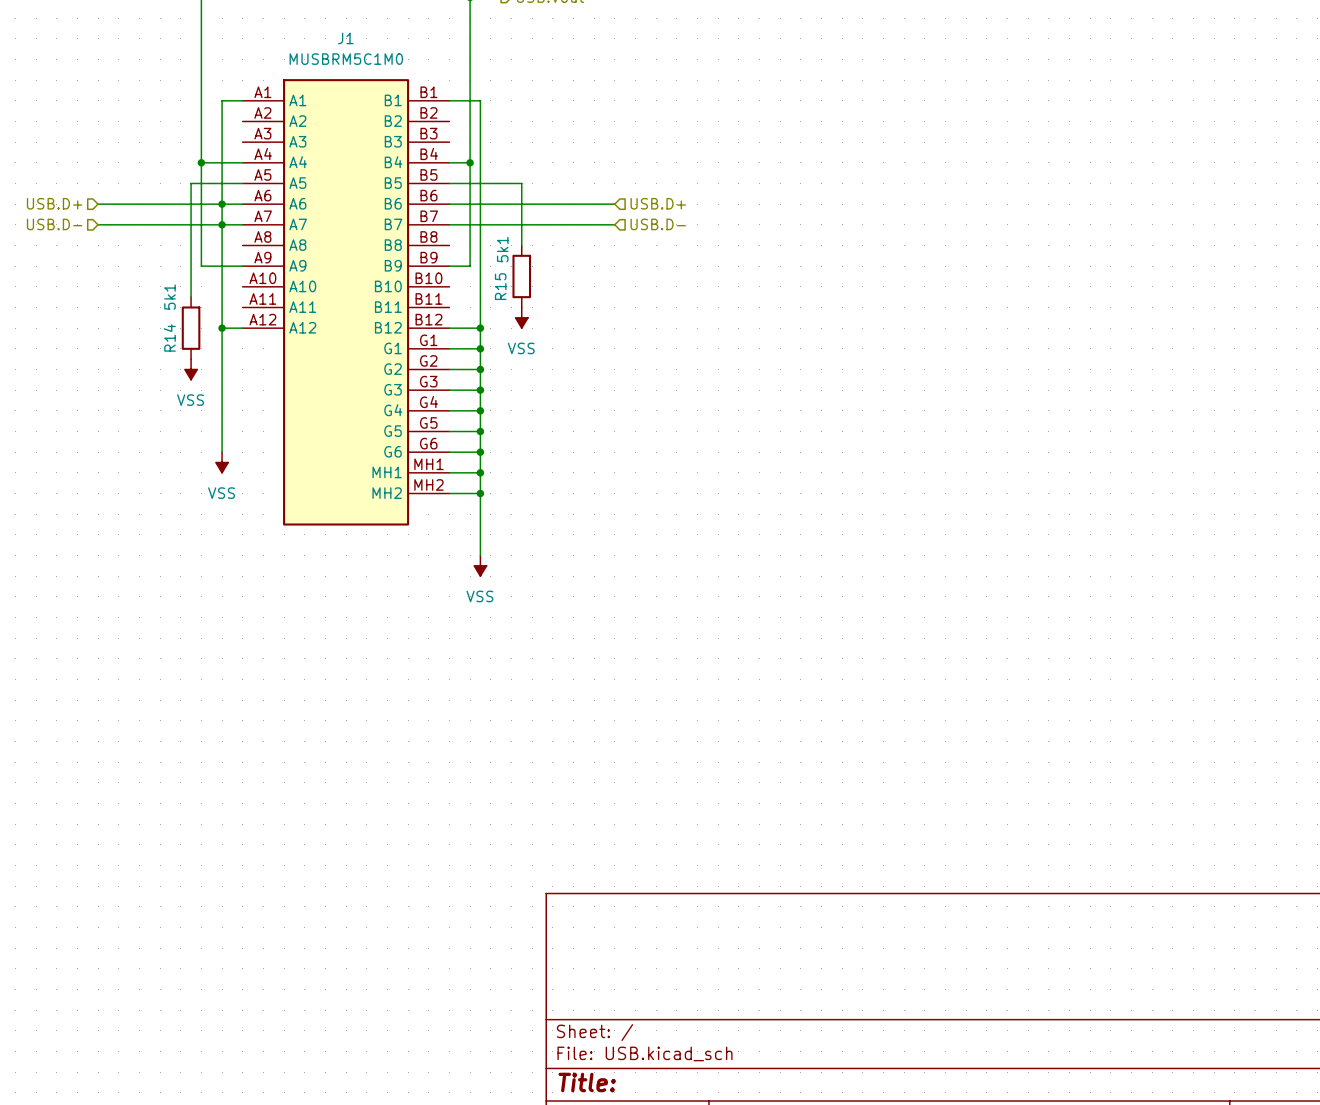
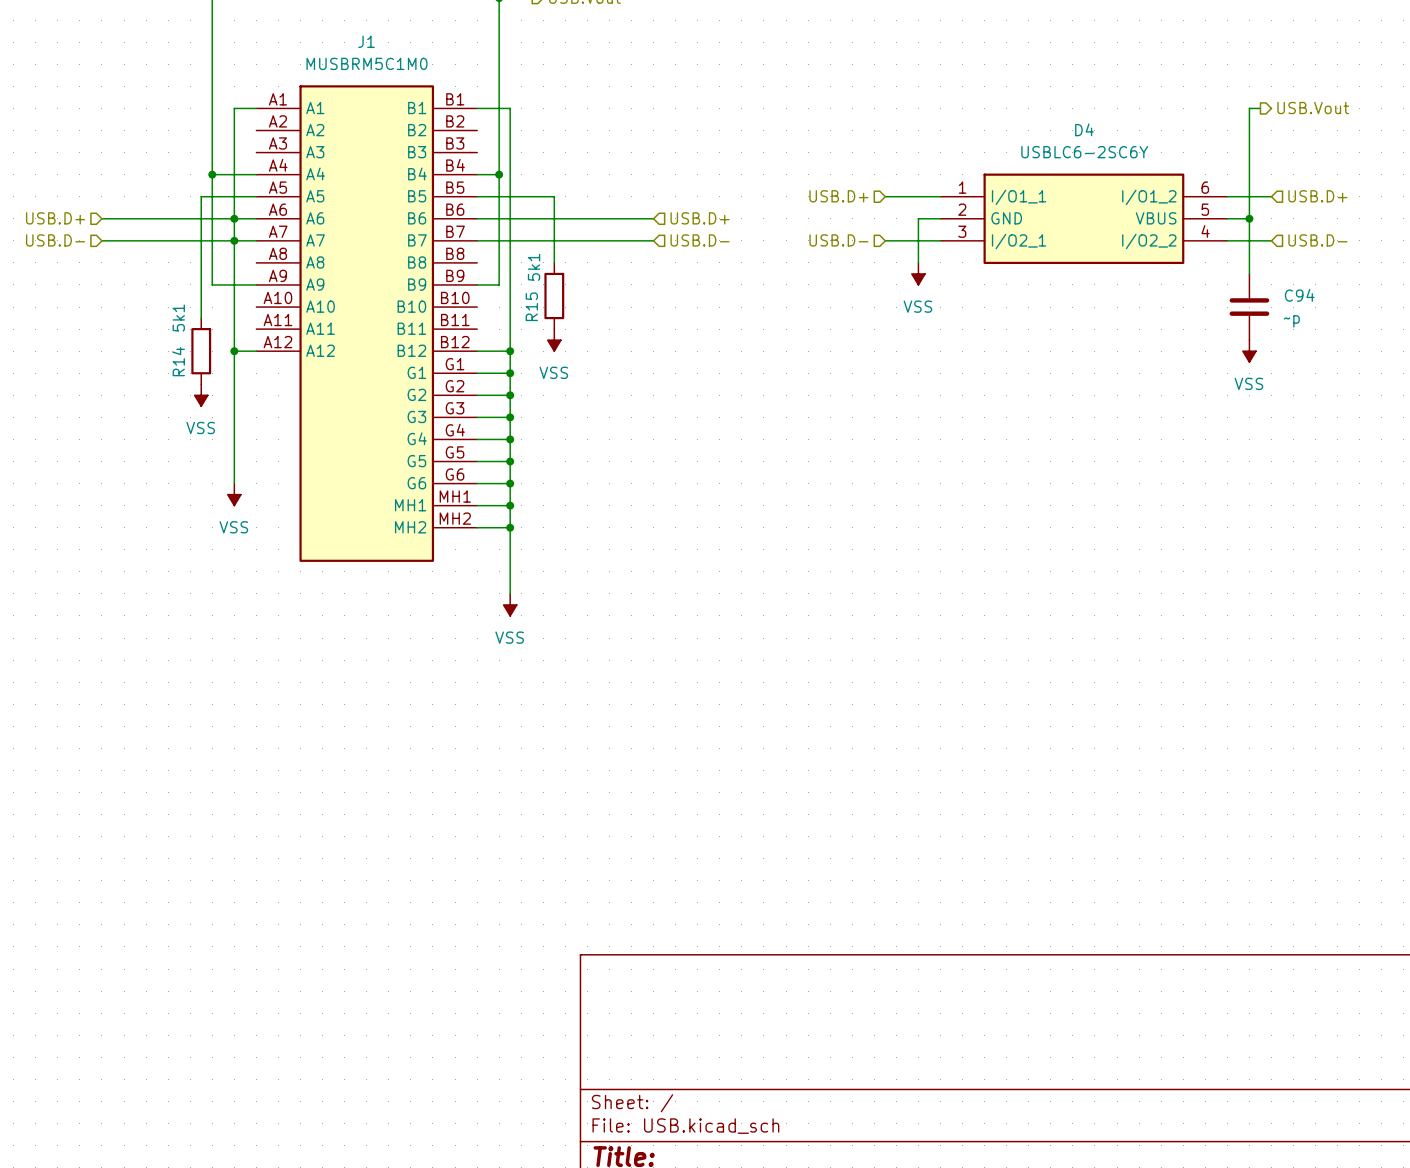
wire: none -> (1260, 108) (1249, 108) (1249, 273)
hierarchical label: none -> USB.Vout (1313, 108)
hierarchical label: none -> USB.D+ (838, 196)
wire: none -> (885, 196) (940, 196)
wire: none -> (1227, 196) (1271, 196)
hierarchical label: none -> USB.D+ (1317, 196)
wire: none -> (940, 218) (918, 218) (918, 262)
D4: none -> USBLC6-2SC6Y (1083, 218)
wire: none -> (1227, 218) (1249, 218)
junction: none -> (1249, 218)
hierarchical label: none -> USB.D- (838, 240)
wire: none -> (885, 240) (940, 240)
wire: none -> (1227, 240) (1271, 240)
hierarchical label: none -> USB.D- (1317, 240)
power symbol: none -> VSS (918, 273)
C94: none -> ~p (1249, 307)
power symbol: none -> VSS (1249, 351)

